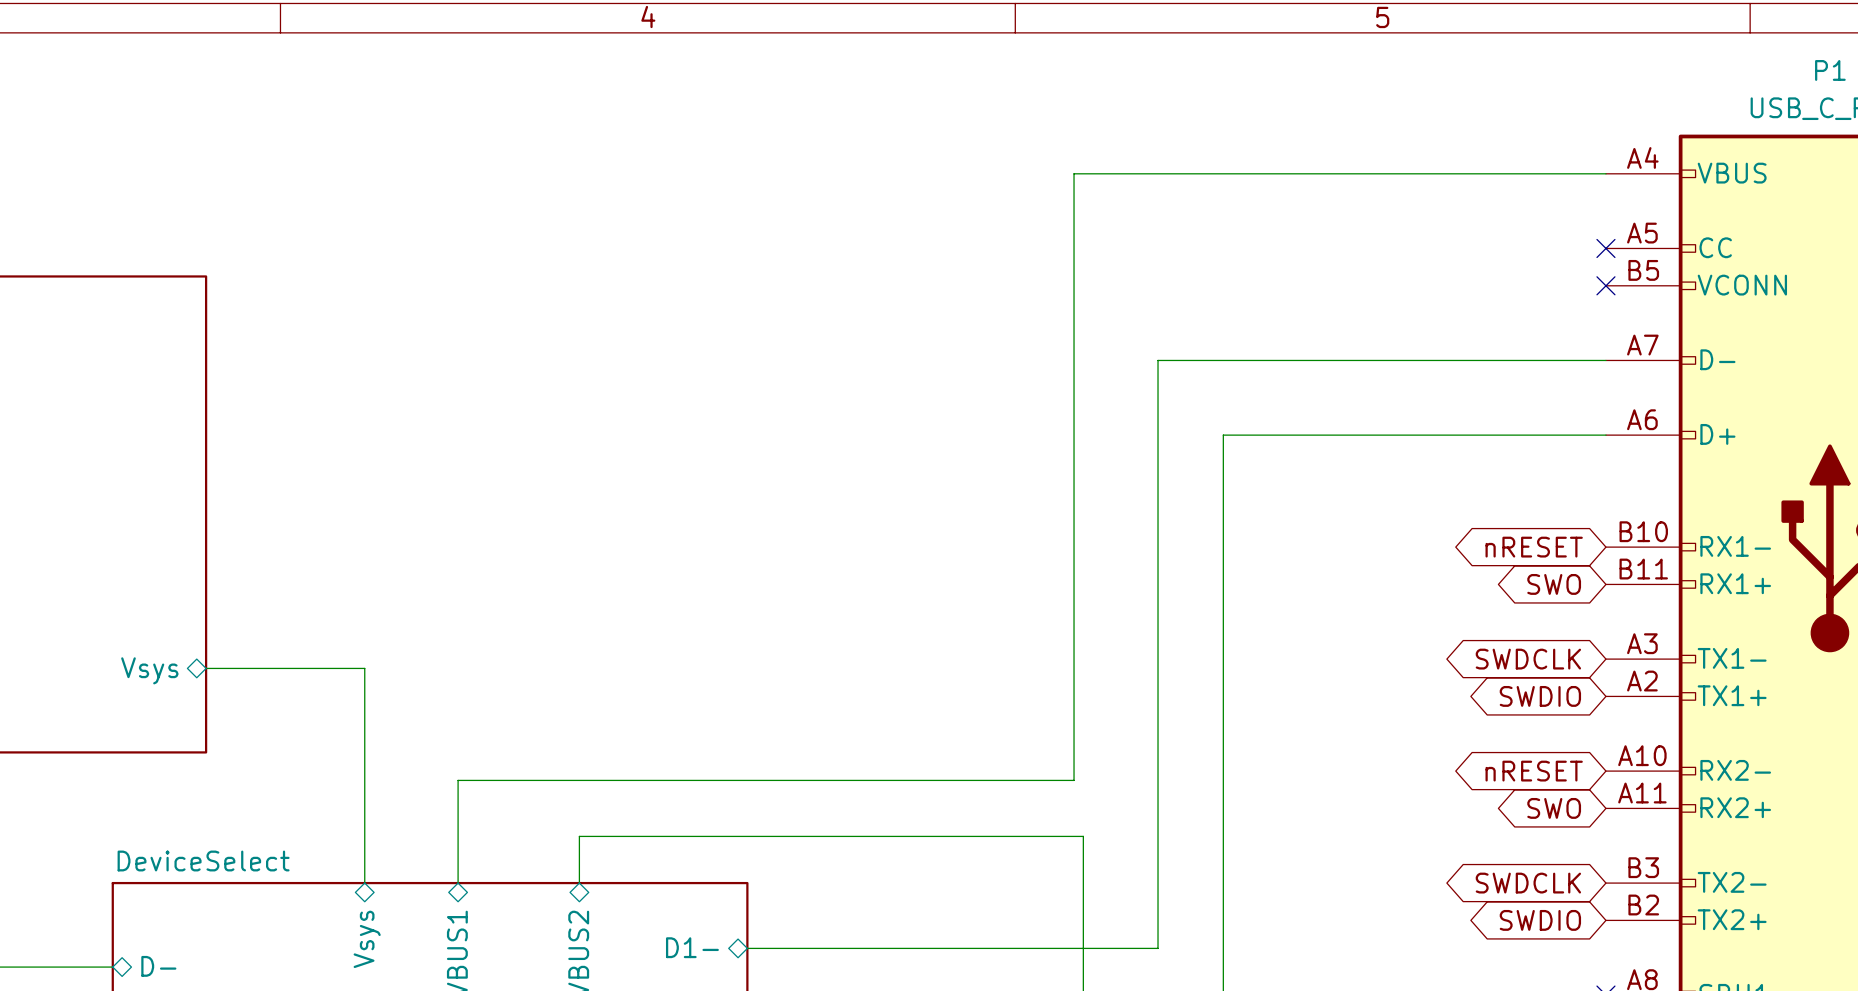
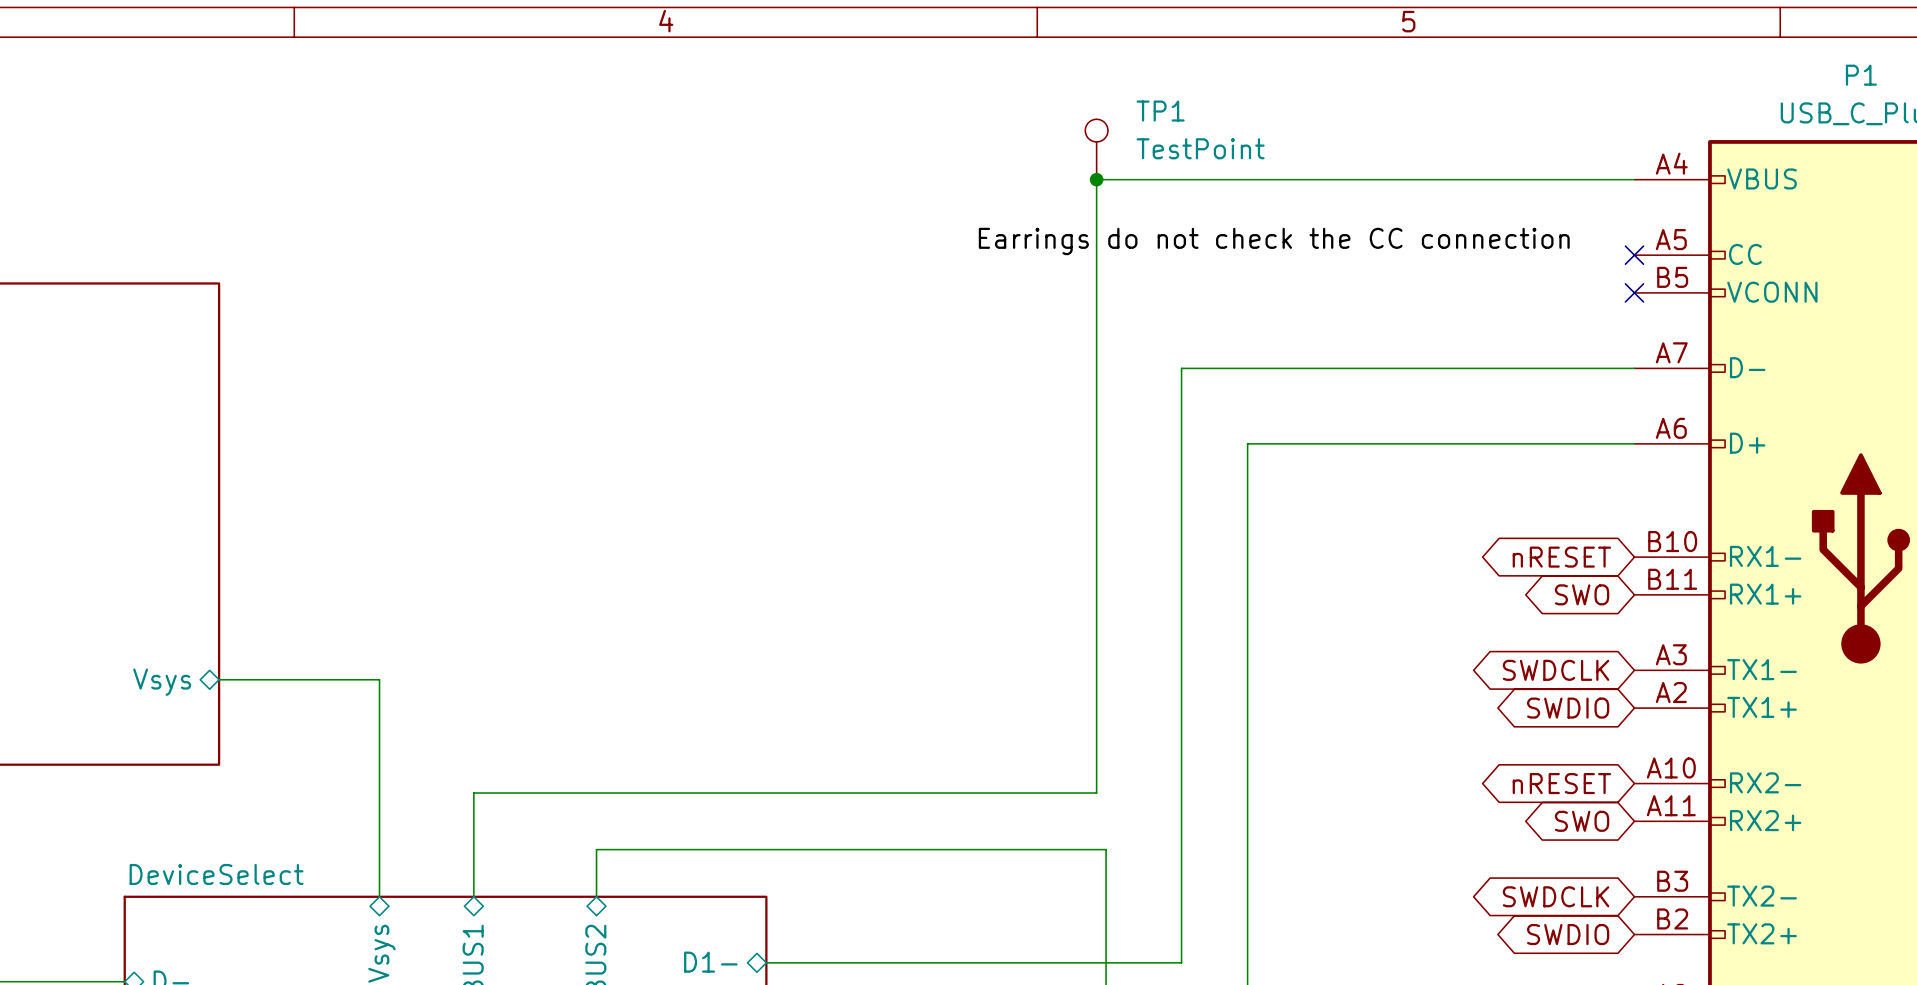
TP1: none -> TestPoint (1096, 149)
junction: none -> (1096, 179)
label: none -> Earrings do not check the CC connection (1274, 241)

